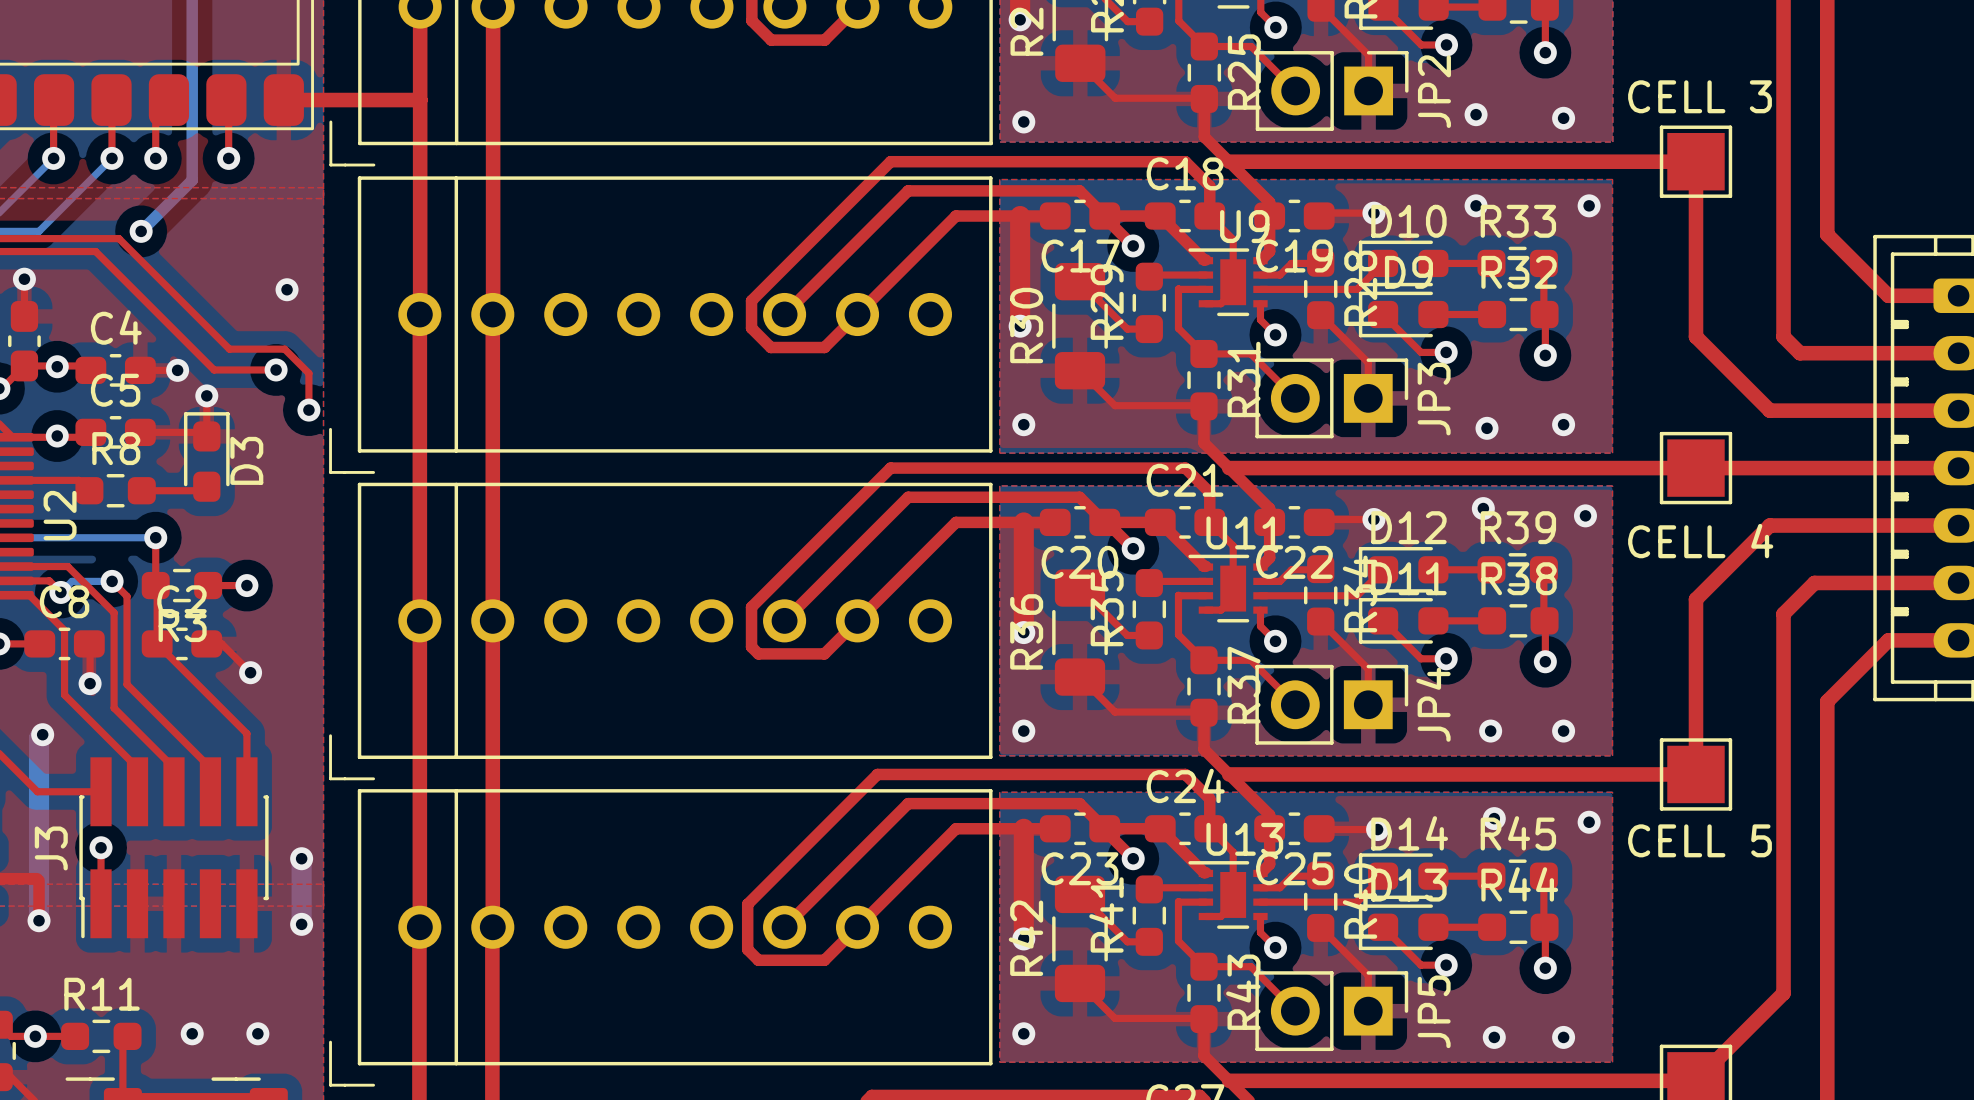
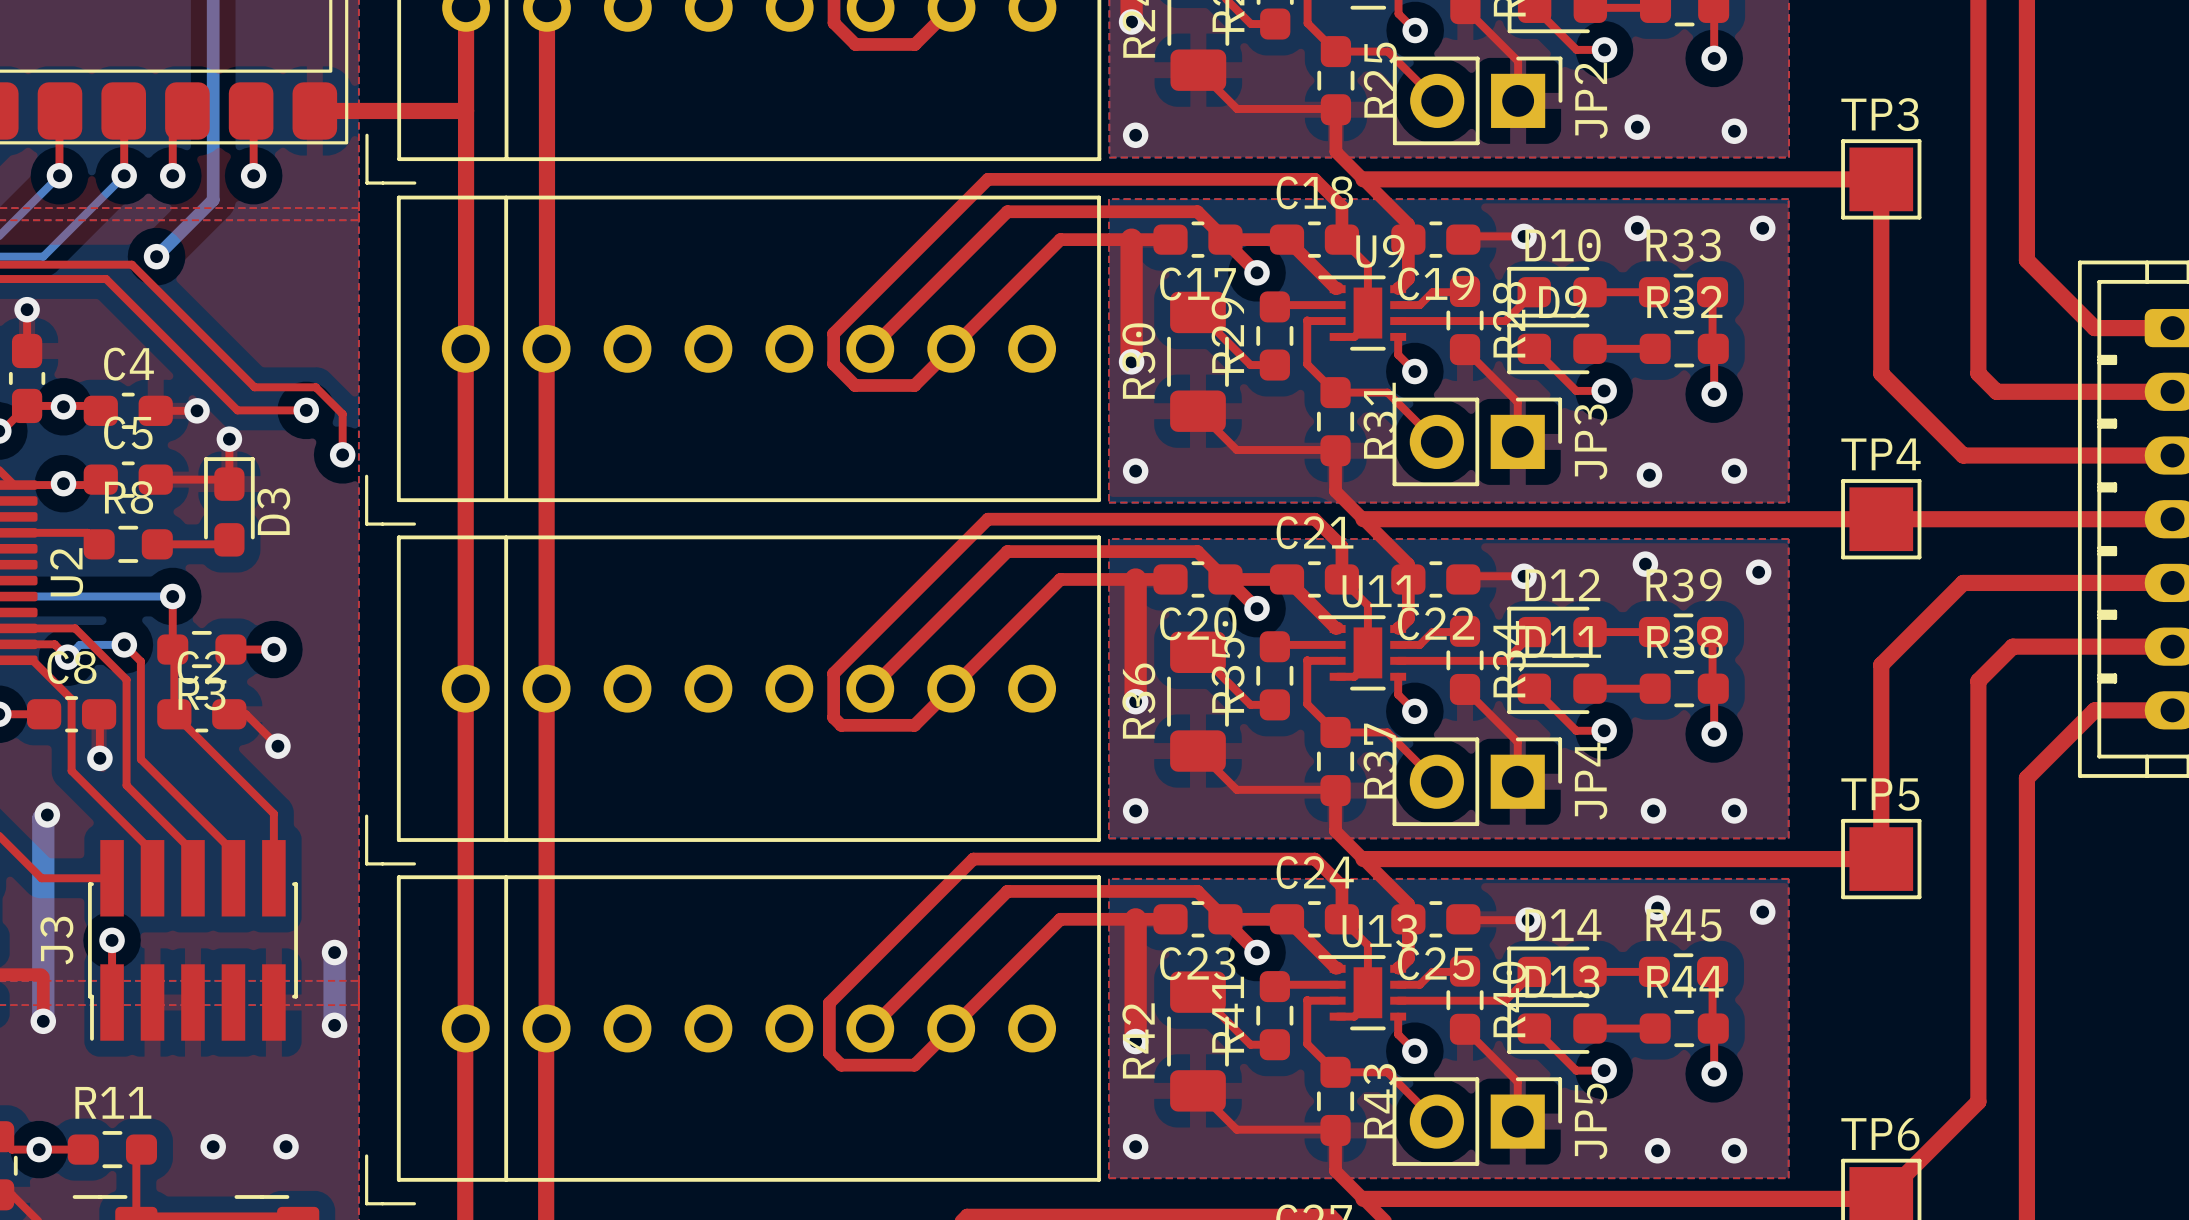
text: CELL 3 (1700, 96) -> none
TP3 name: none -> TP3 (1879, 114)
via: (287, 289) -> none
TP4 name: none -> TP4 (1880, 454)
text: CELL 4 (1700, 541) -> none
TP5 name: none -> TP5 (1880, 794)
text: CELL 5 (1700, 840) -> none
TP6 name: none -> TP6 (1880, 1134)

